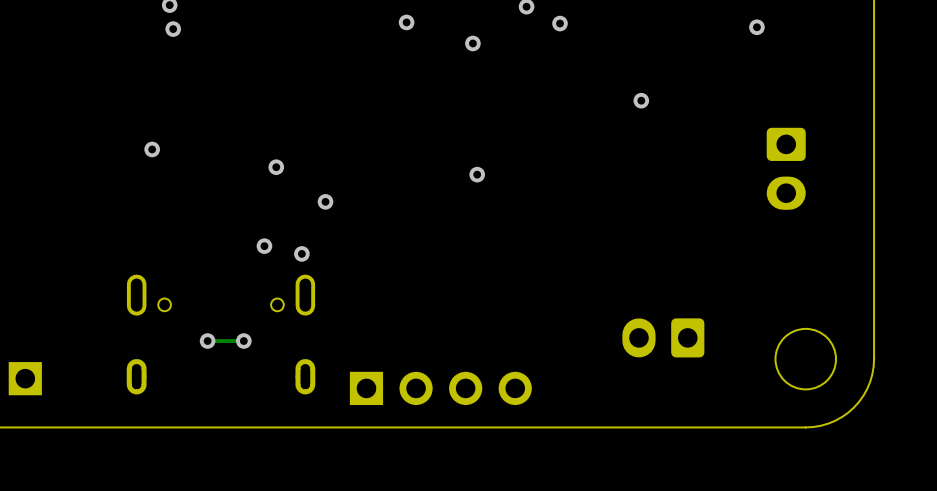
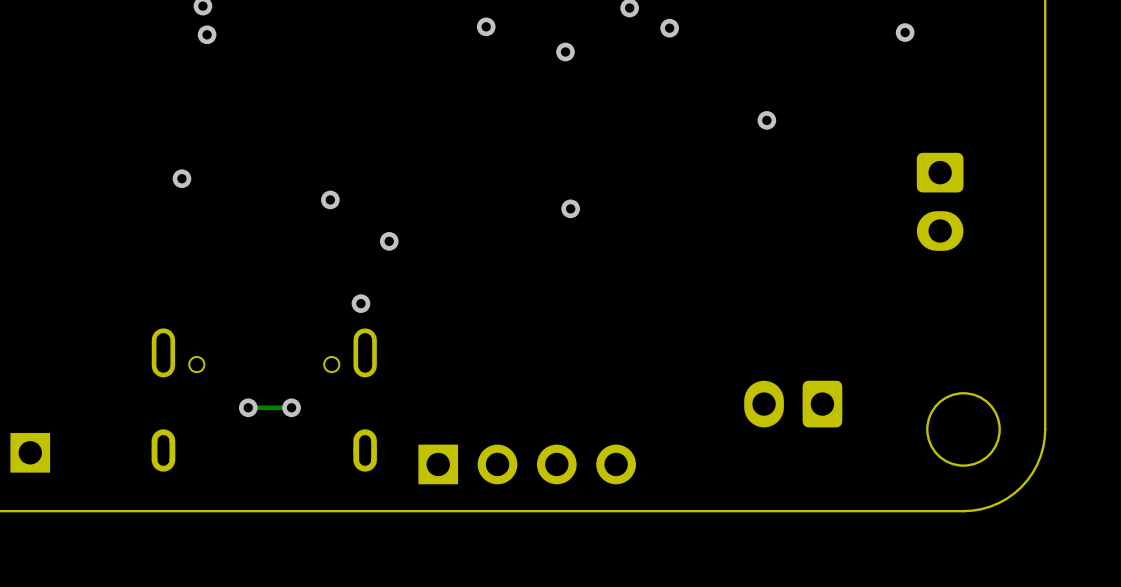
via: (264, 246) -> none

